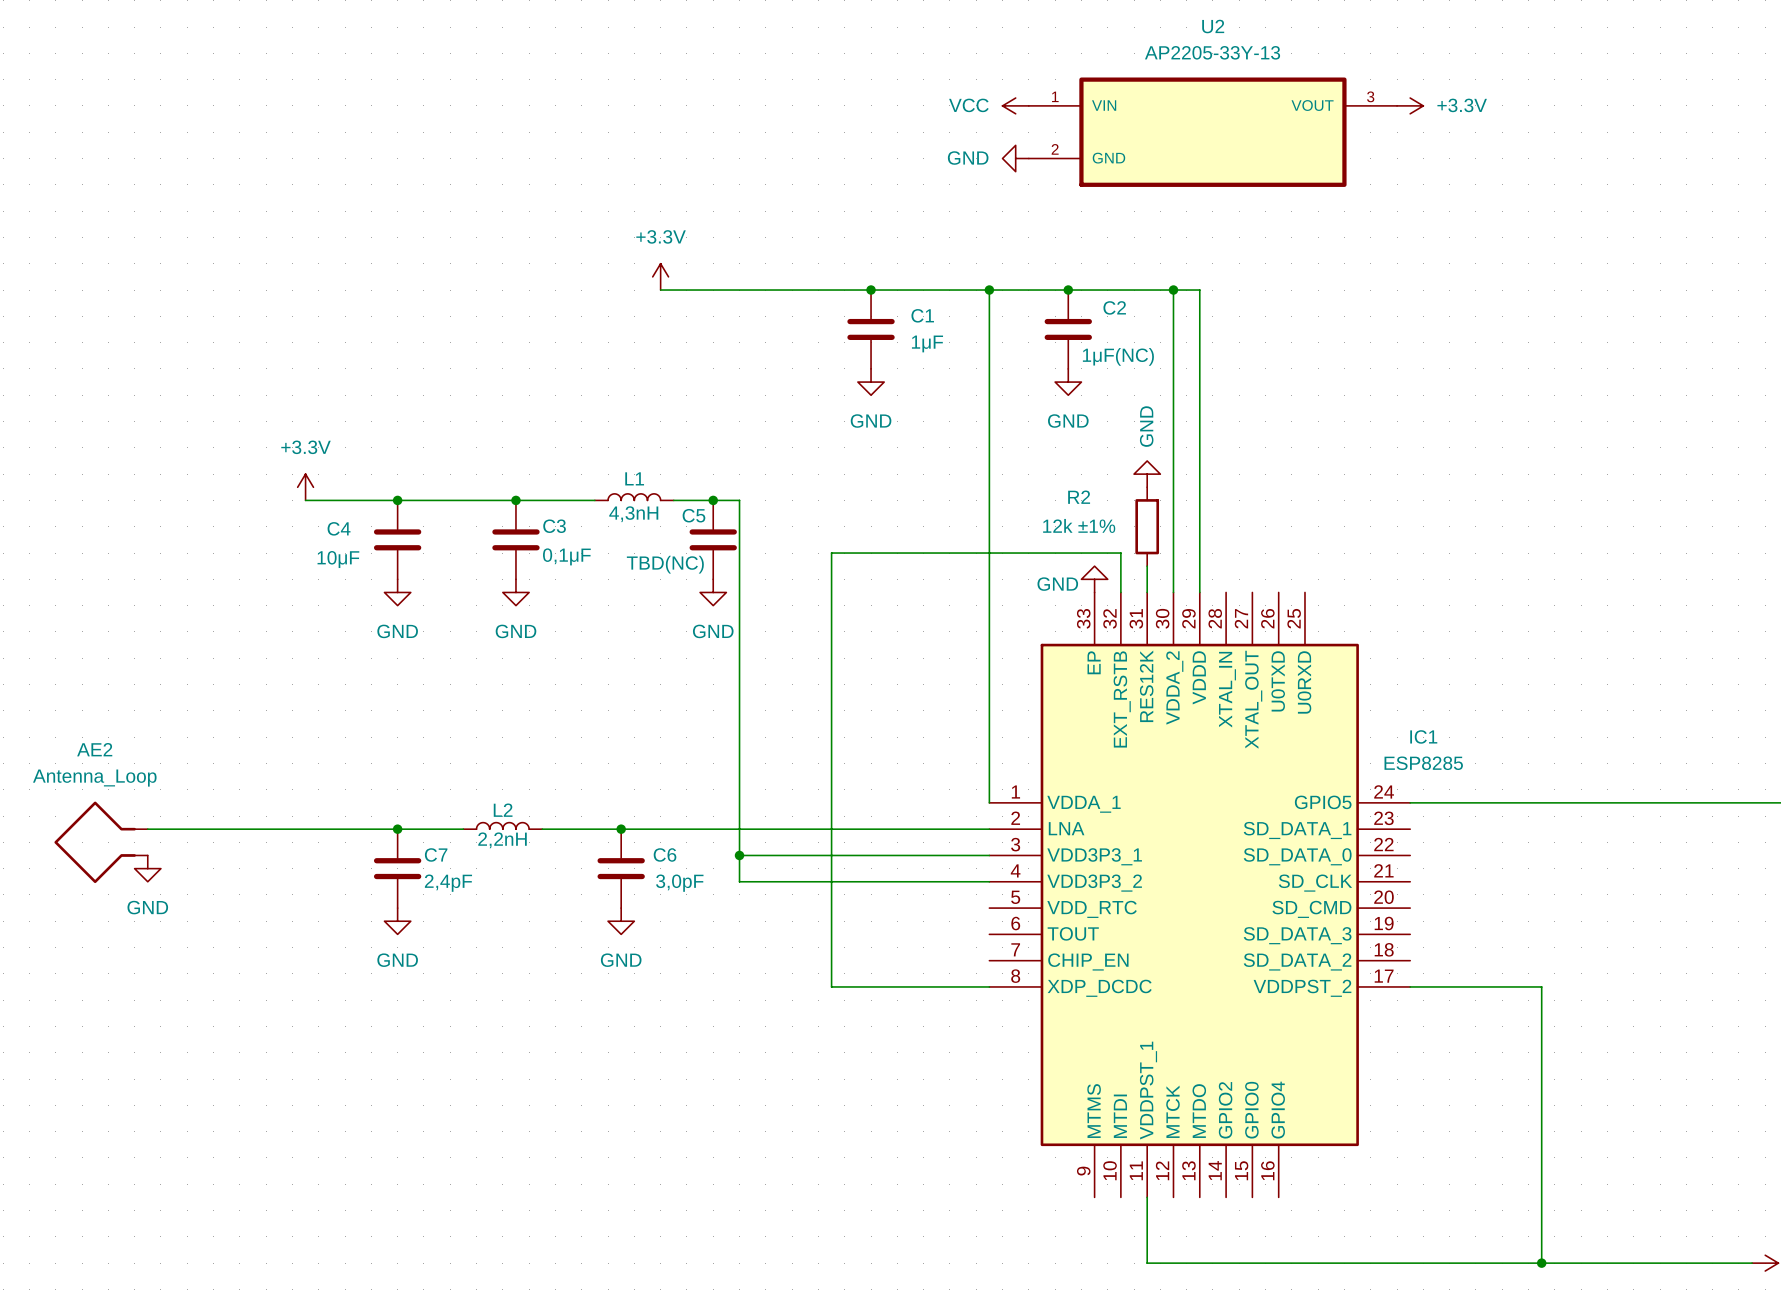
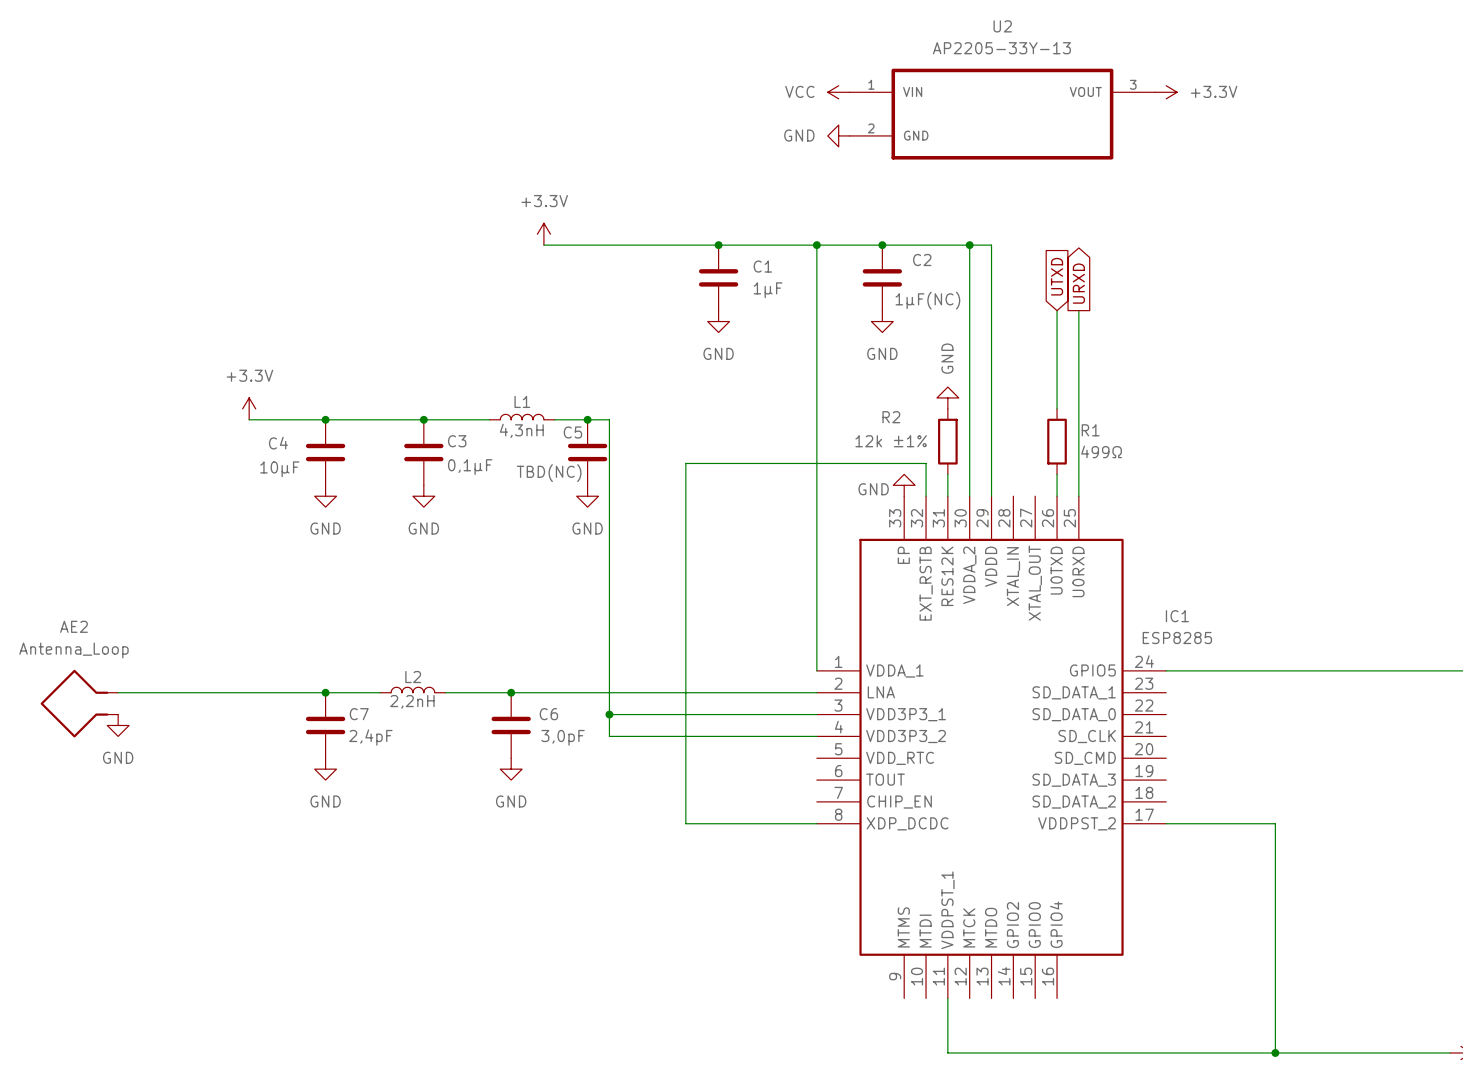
global label: none -> UTXD (1057, 276)
global label: none -> URXD (1078, 283)
wire: none -> (1057, 310) (1057, 408)
wire: none -> (1078, 310) (1078, 496)
R1: none -> 499Ω (1057, 441)
wire: none -> (1057, 474) (1057, 496)

